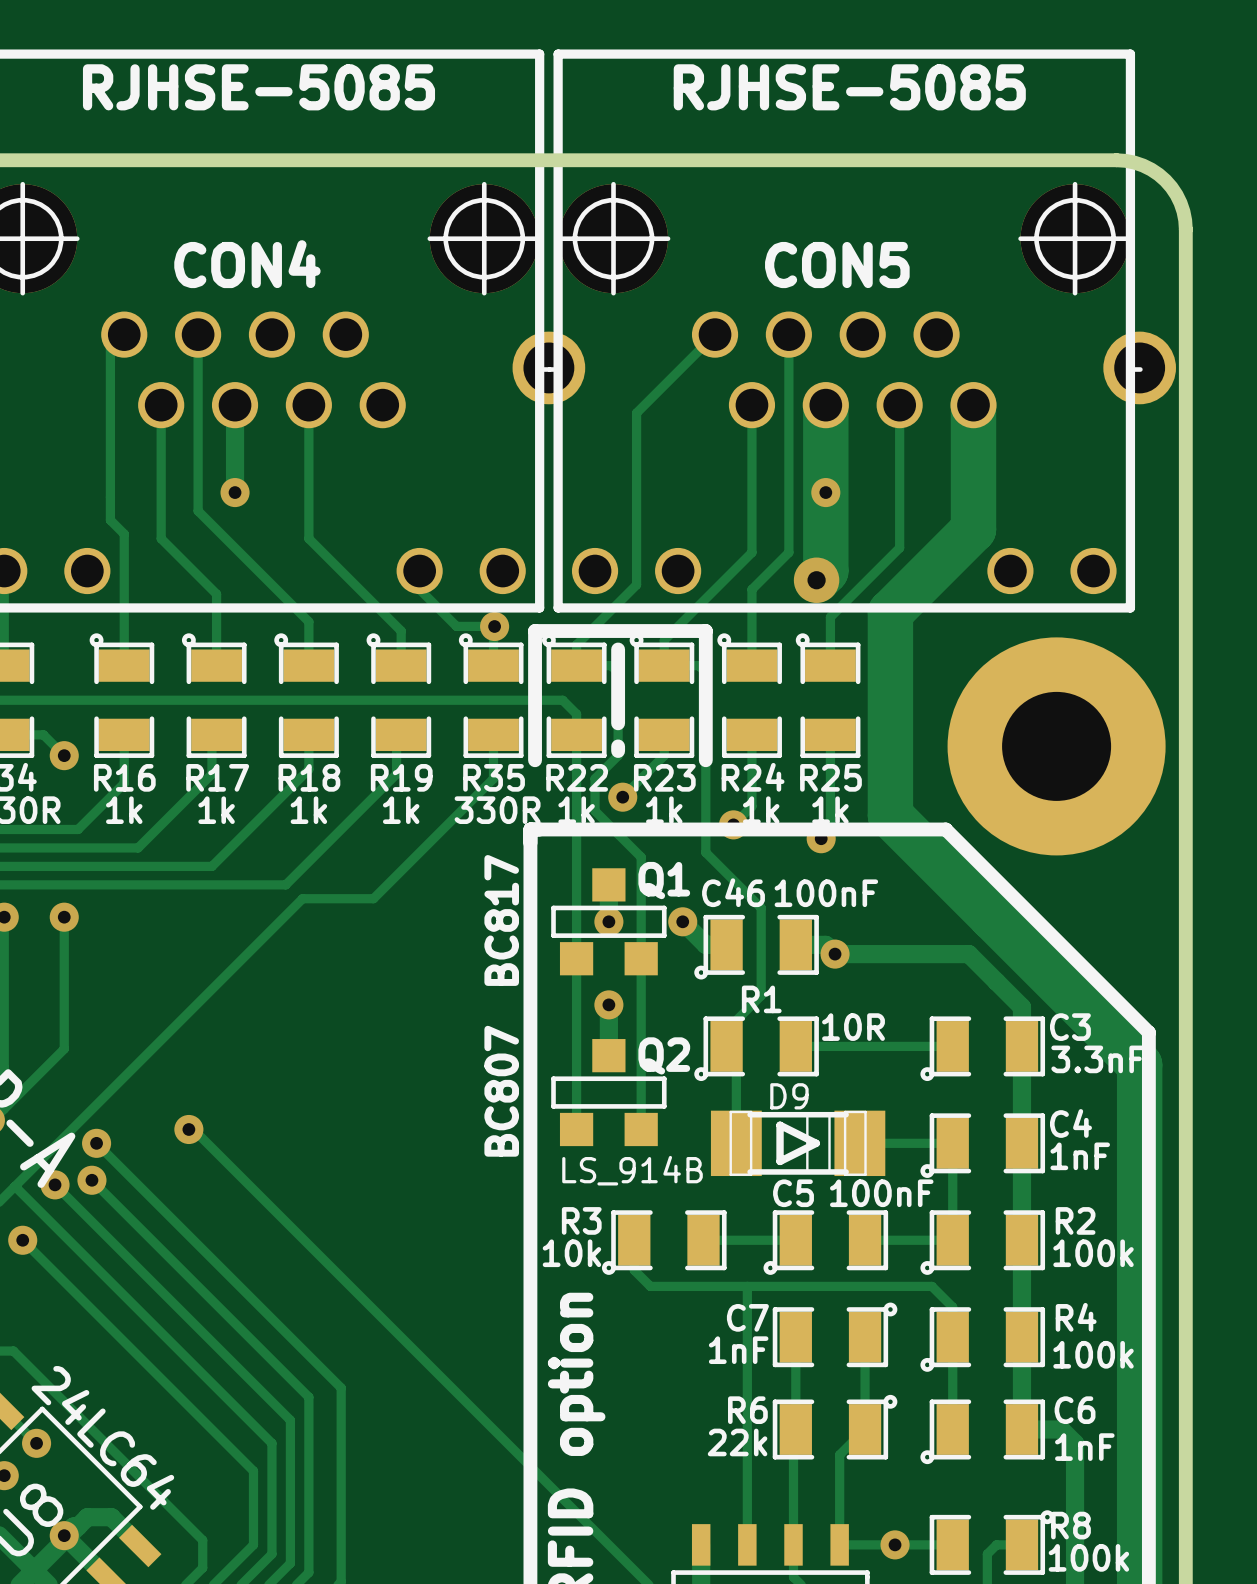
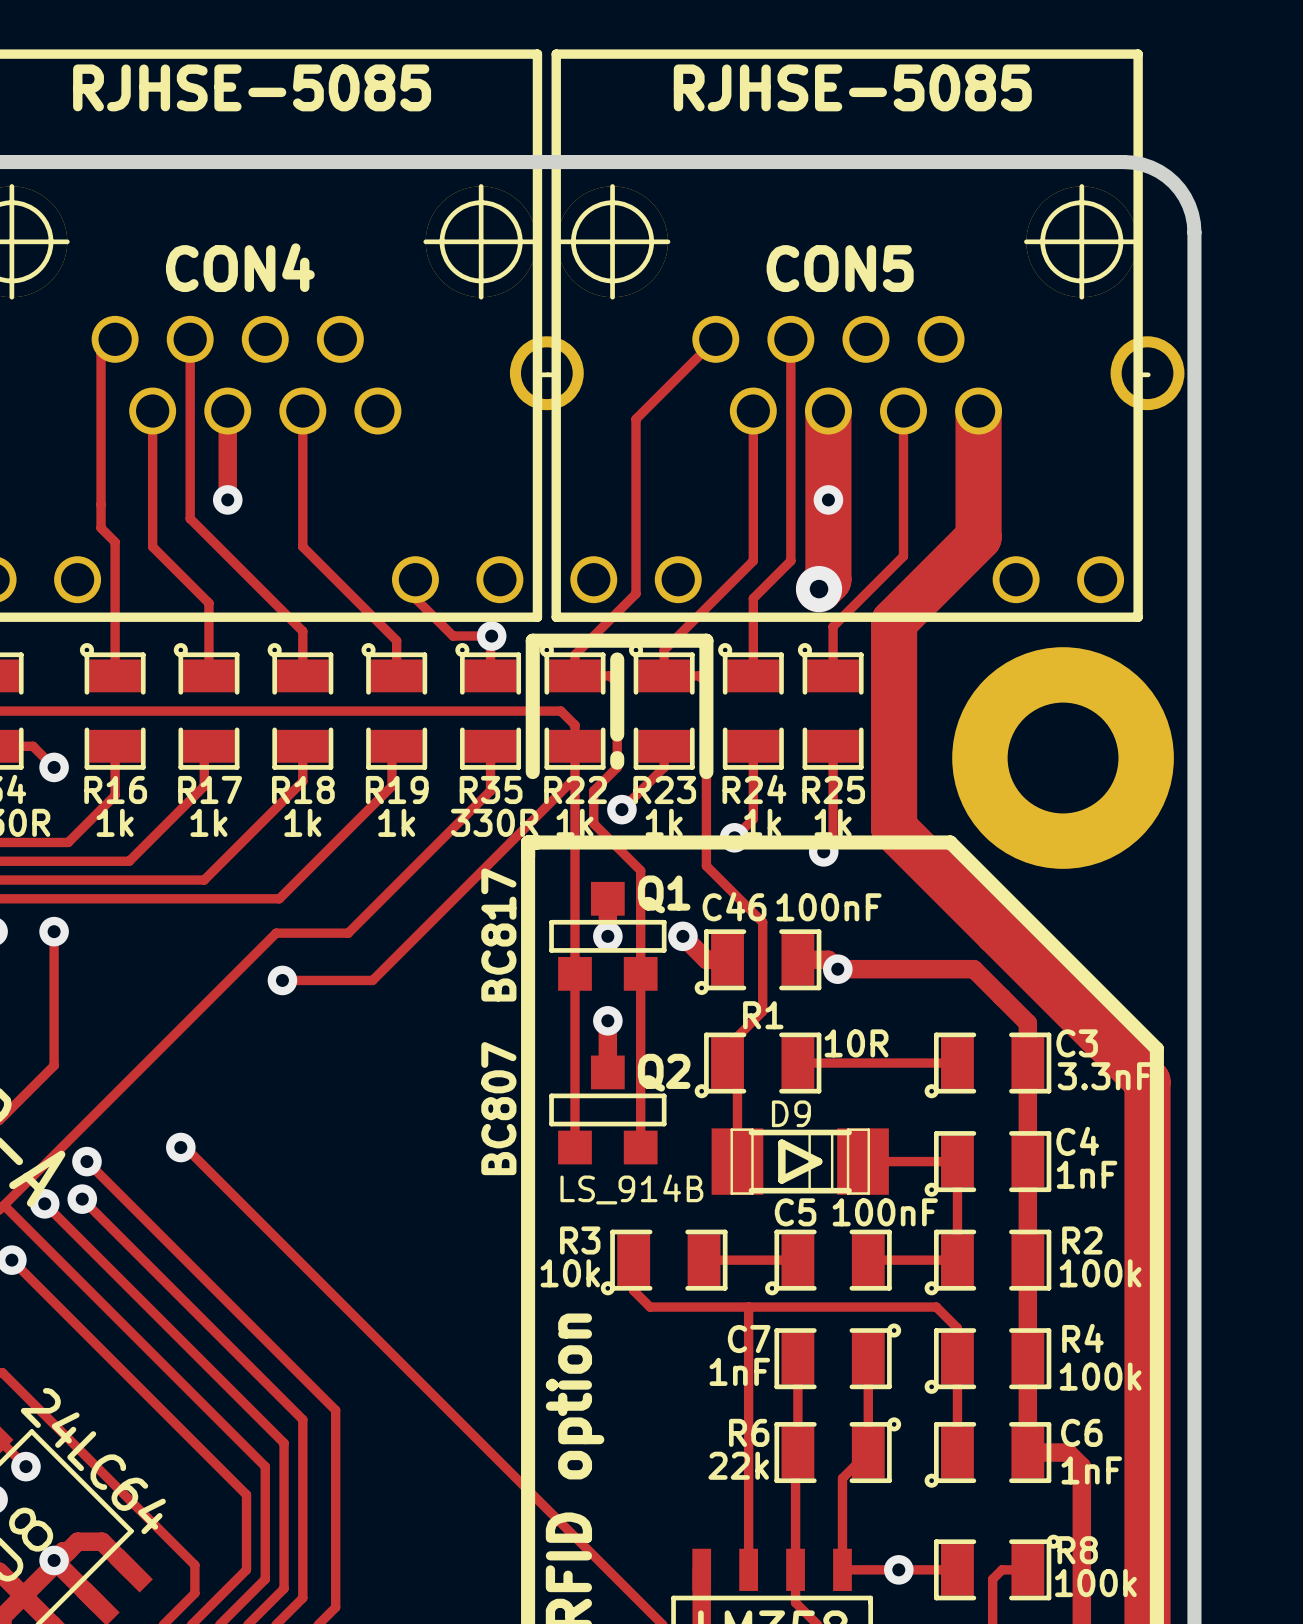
track: none -> (575, 778) (372, 980) (282, 980)
track: (373, 898) (302, 898) (282, 918) -> (368, 912) (348, 933) (276, 933)
via: none -> (282, 980)

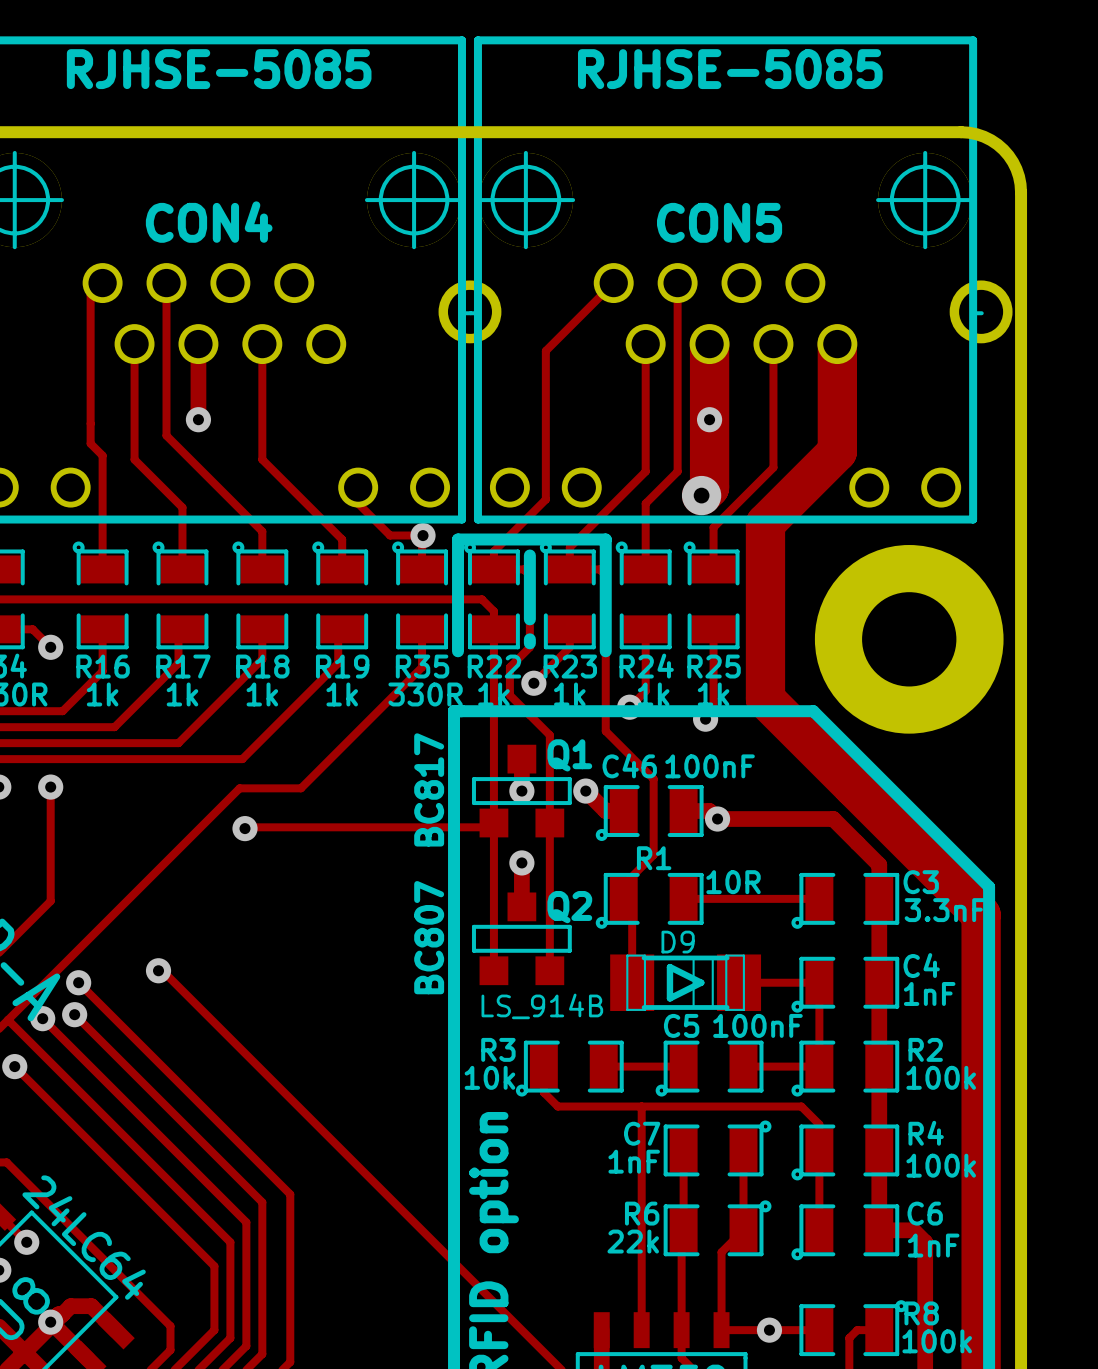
track: (575, 778) (372, 980) (282, 980) -> none
track: none -> (493, 823) (489, 827) (250, 826)

